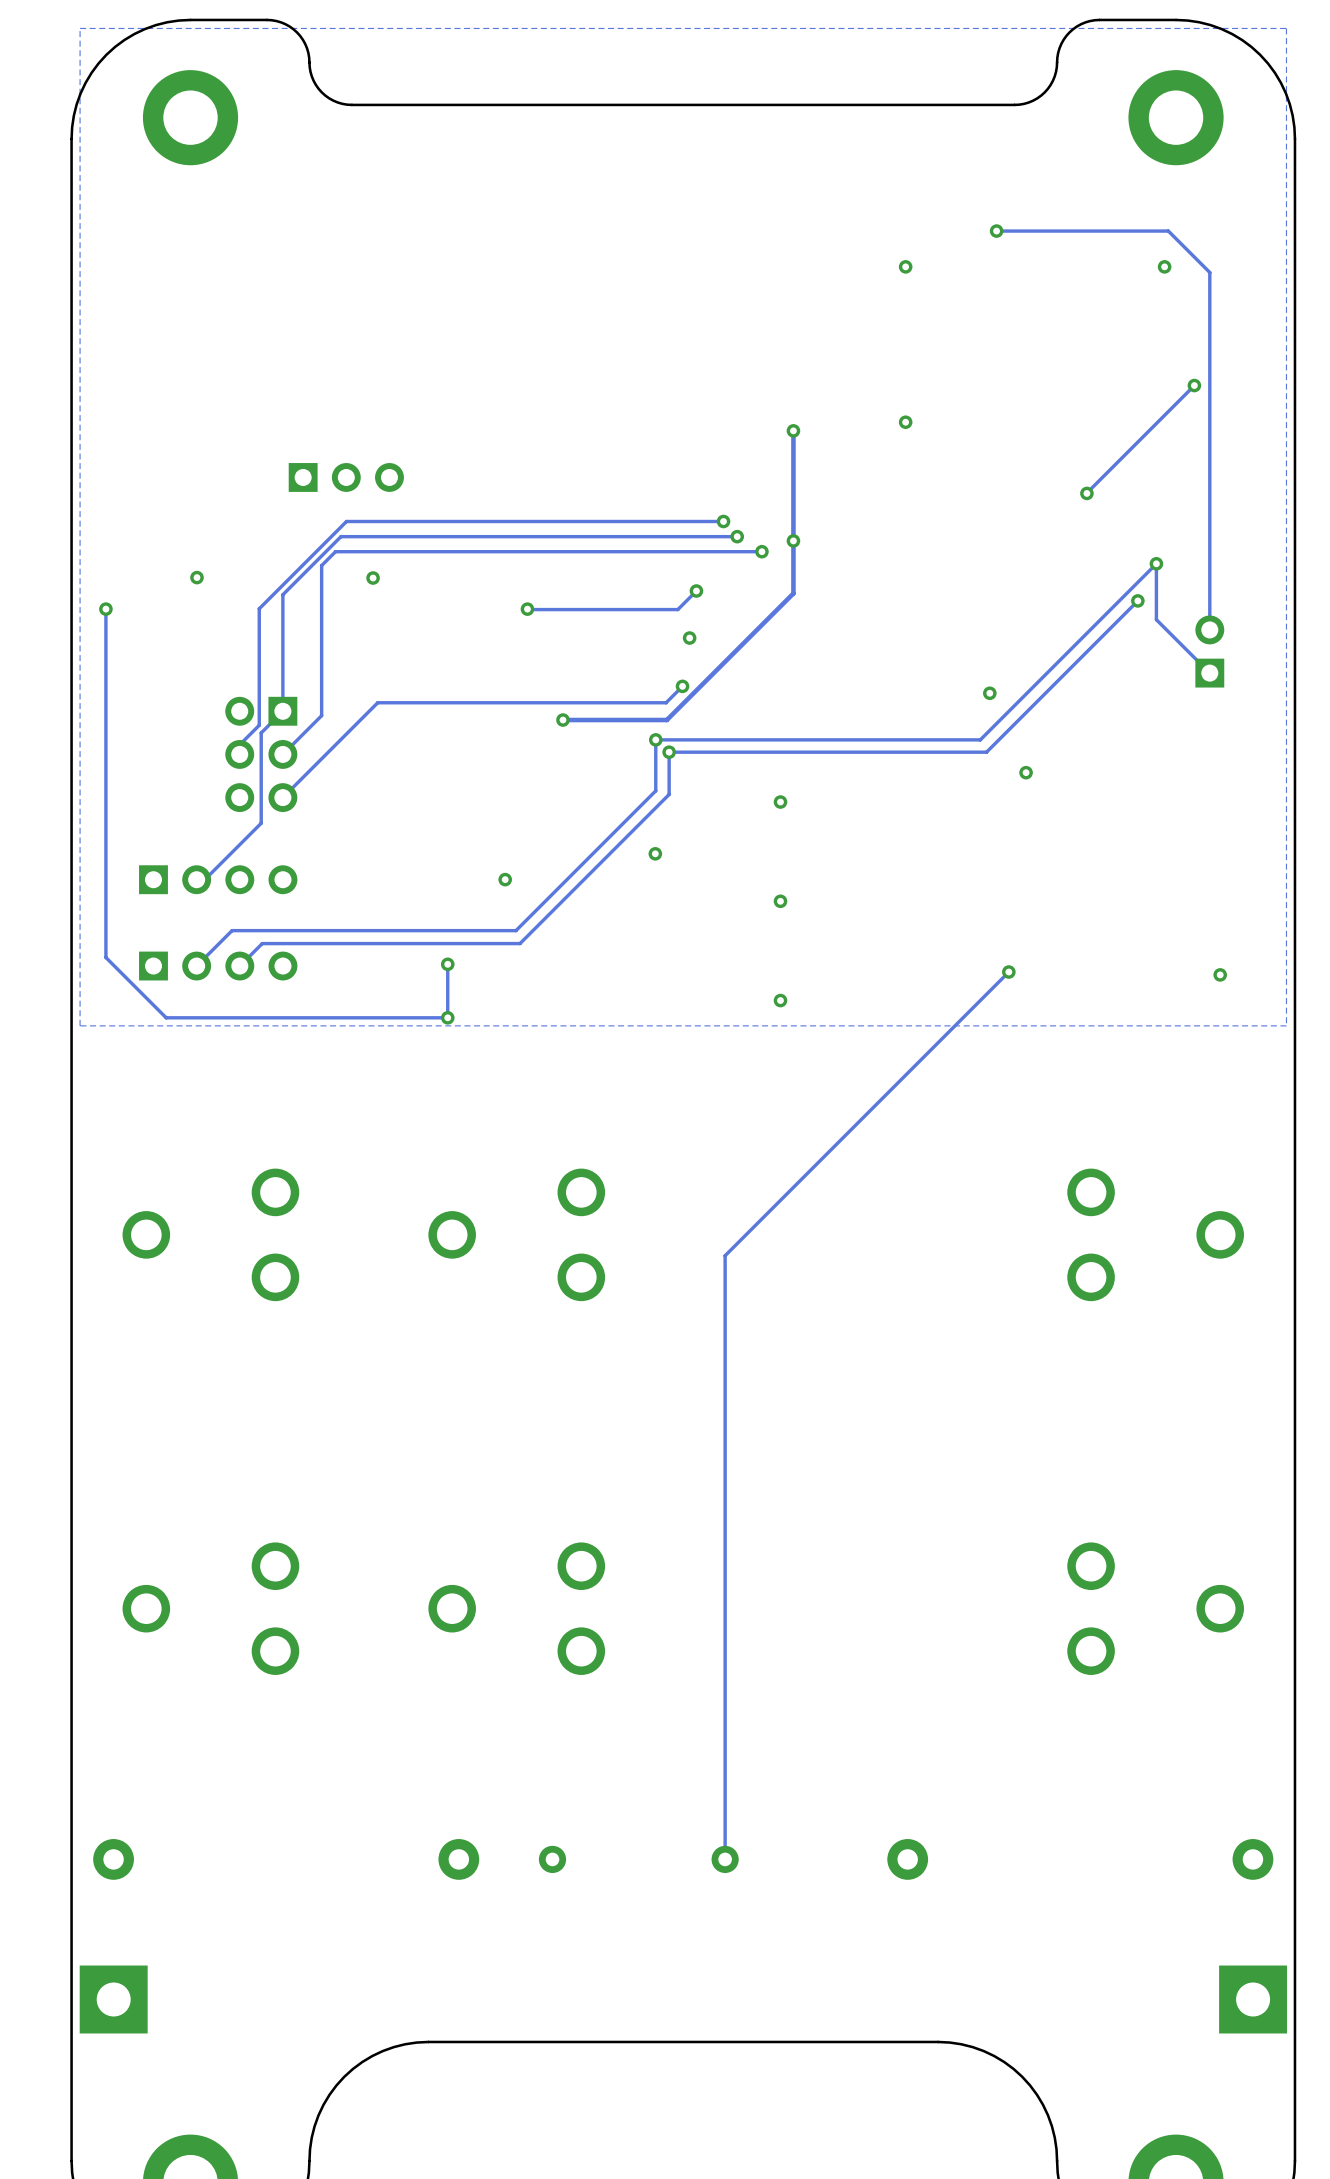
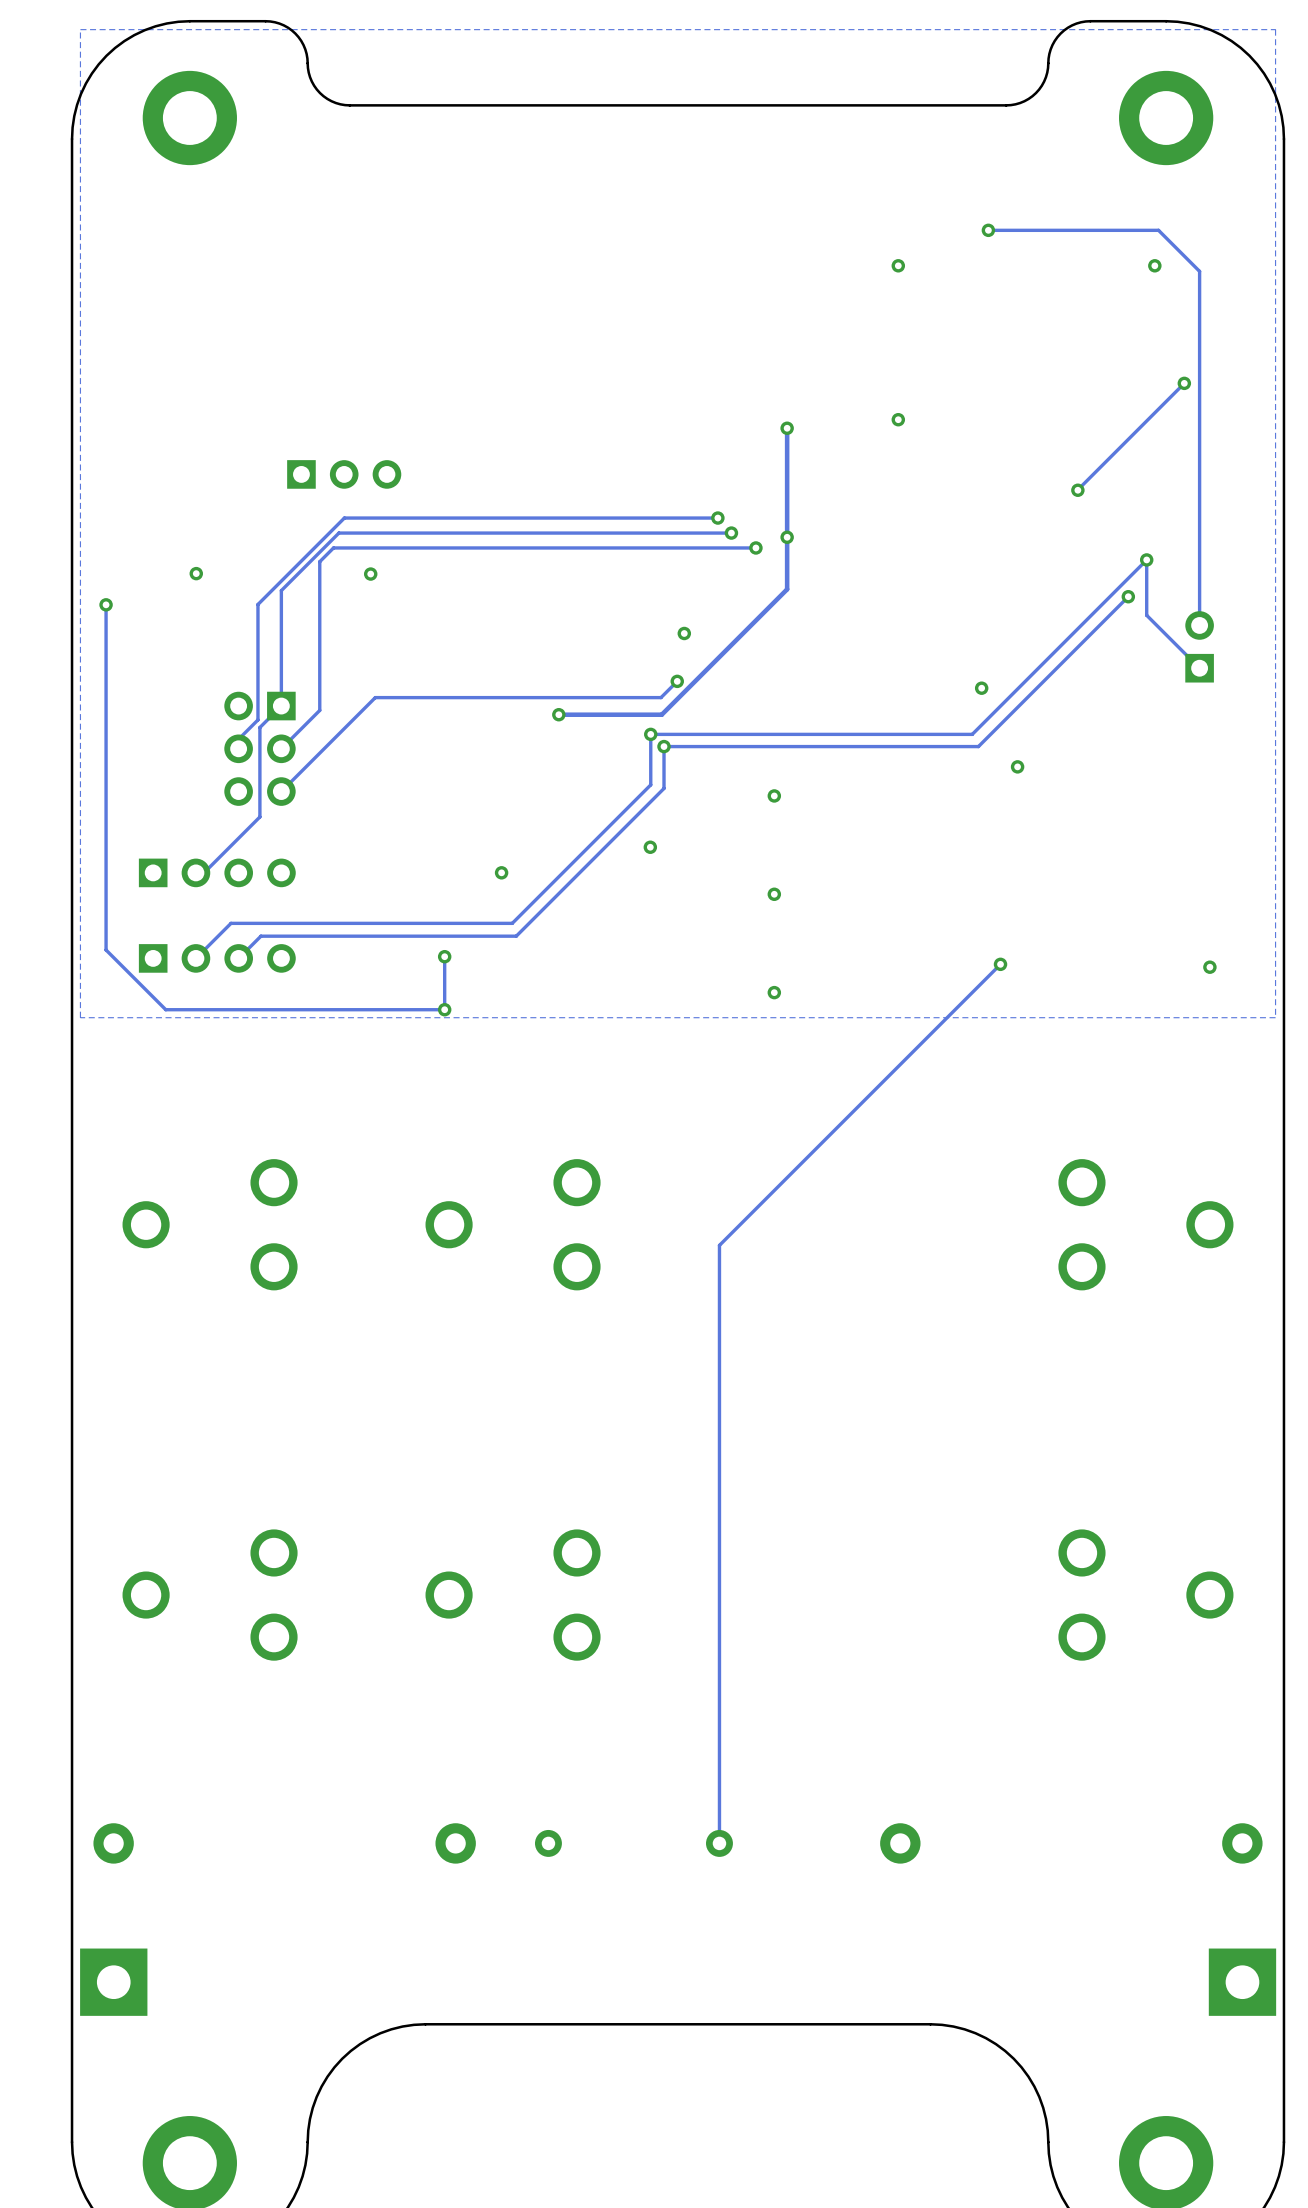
track: (696, 591) (677, 609) (527, 609) -> none
via: (696, 591) -> none
via: (527, 609) -> none

